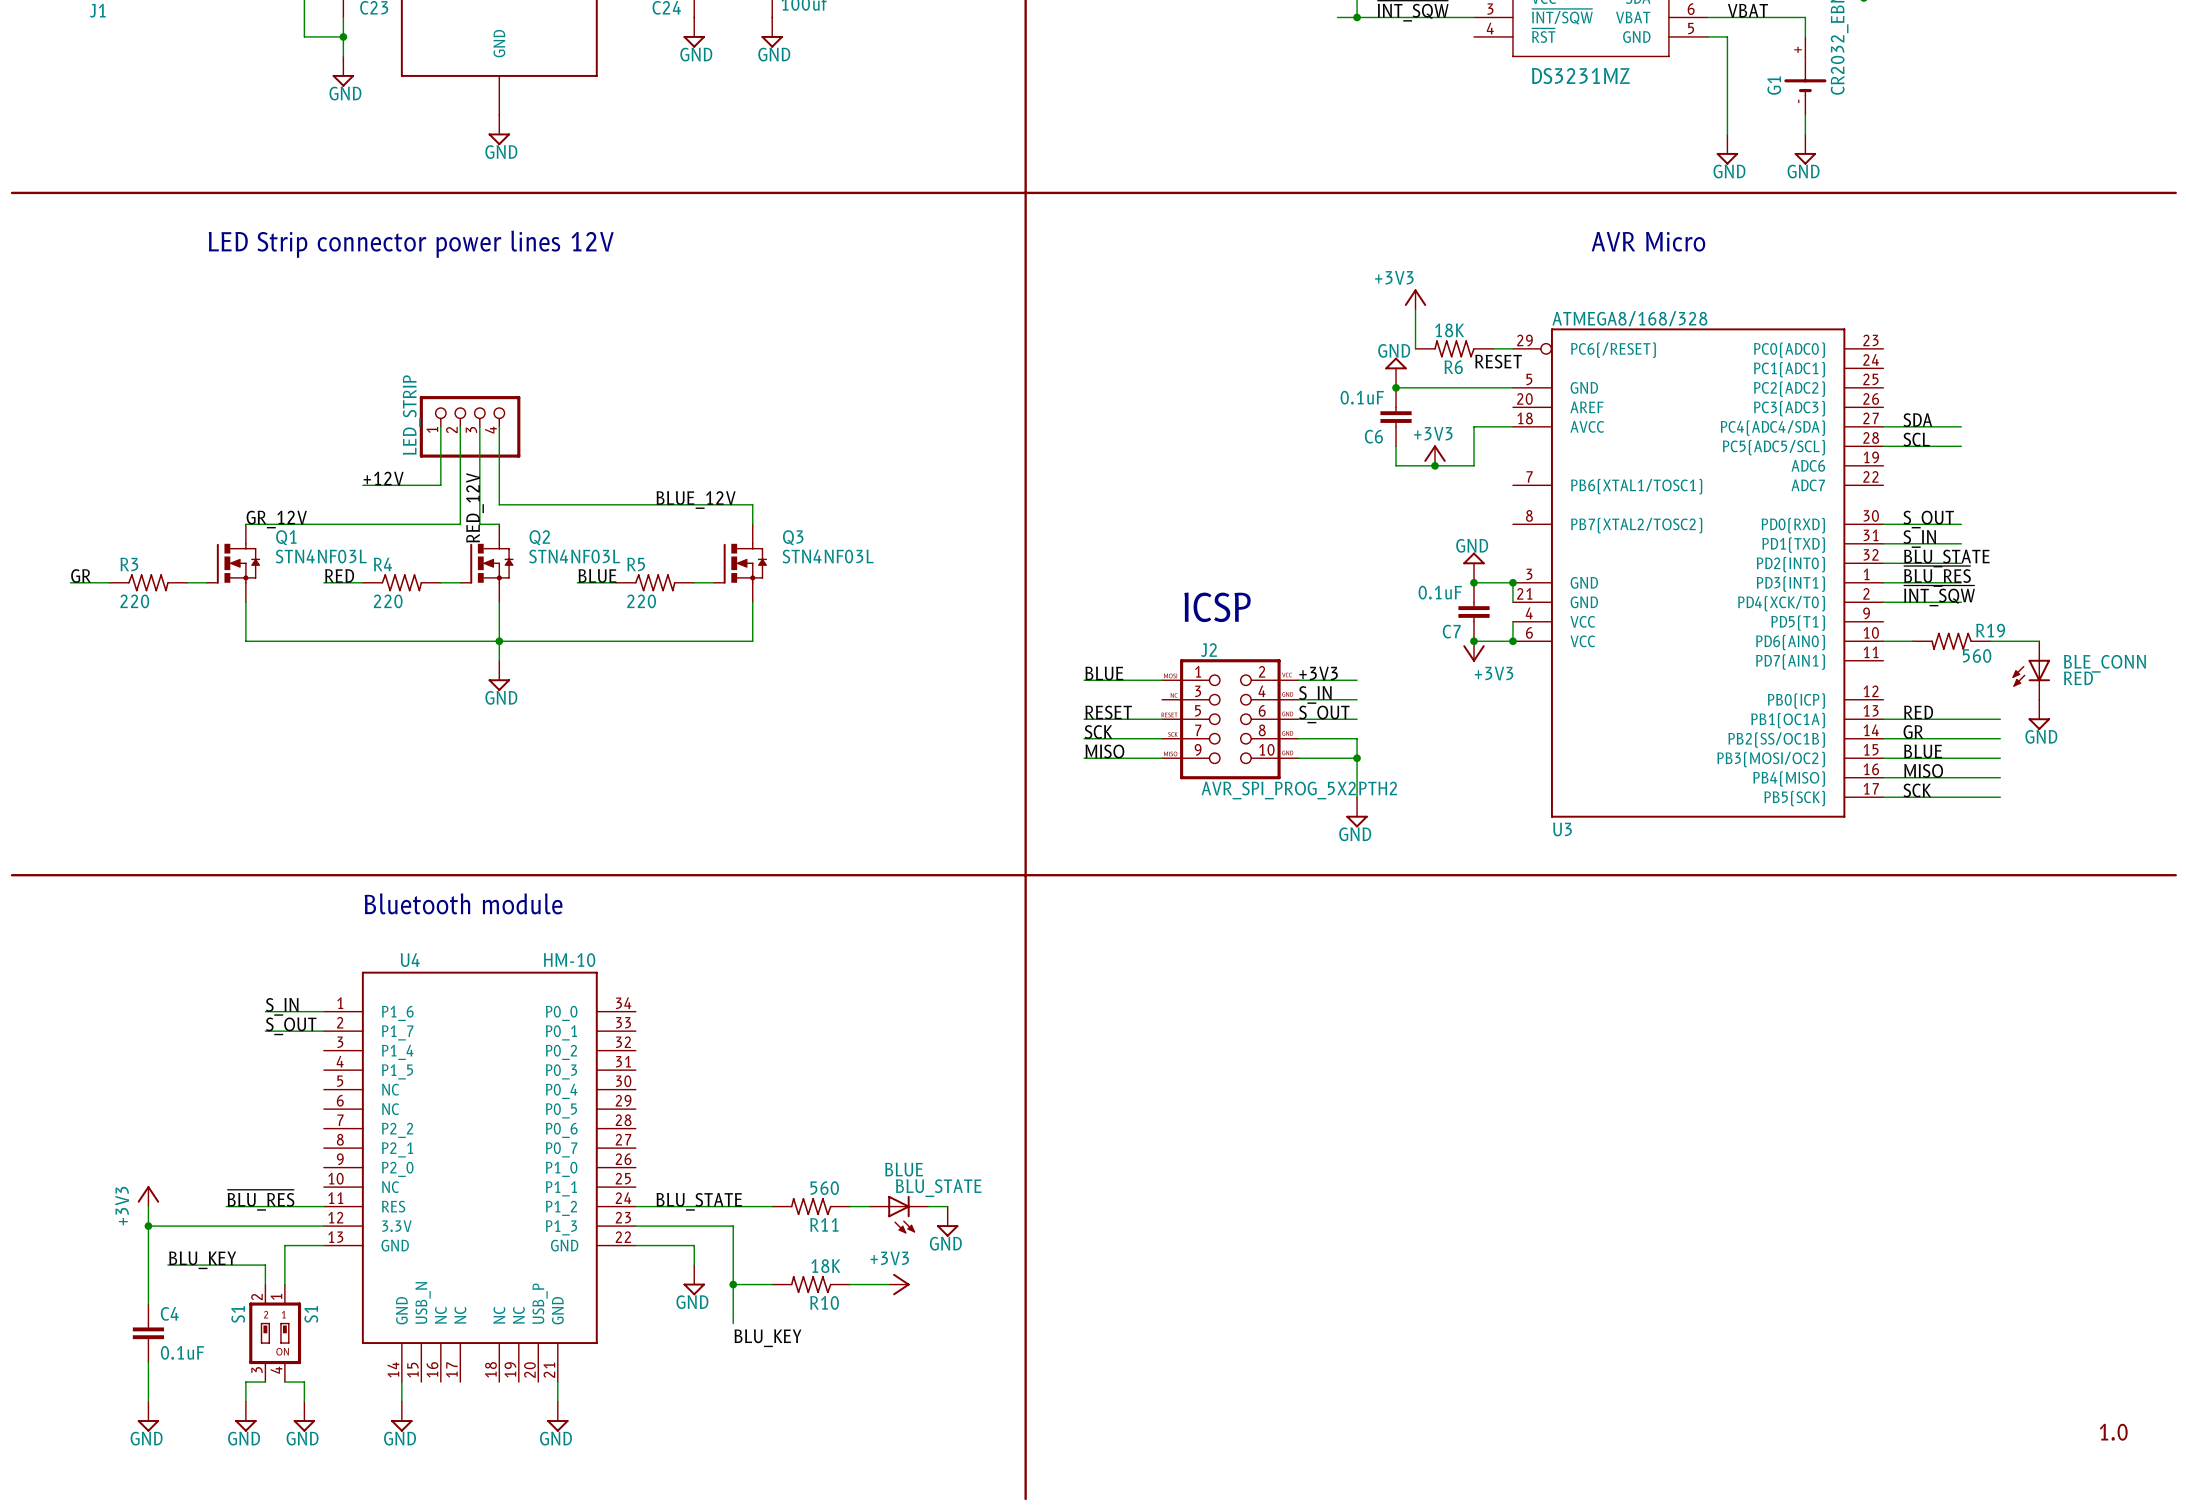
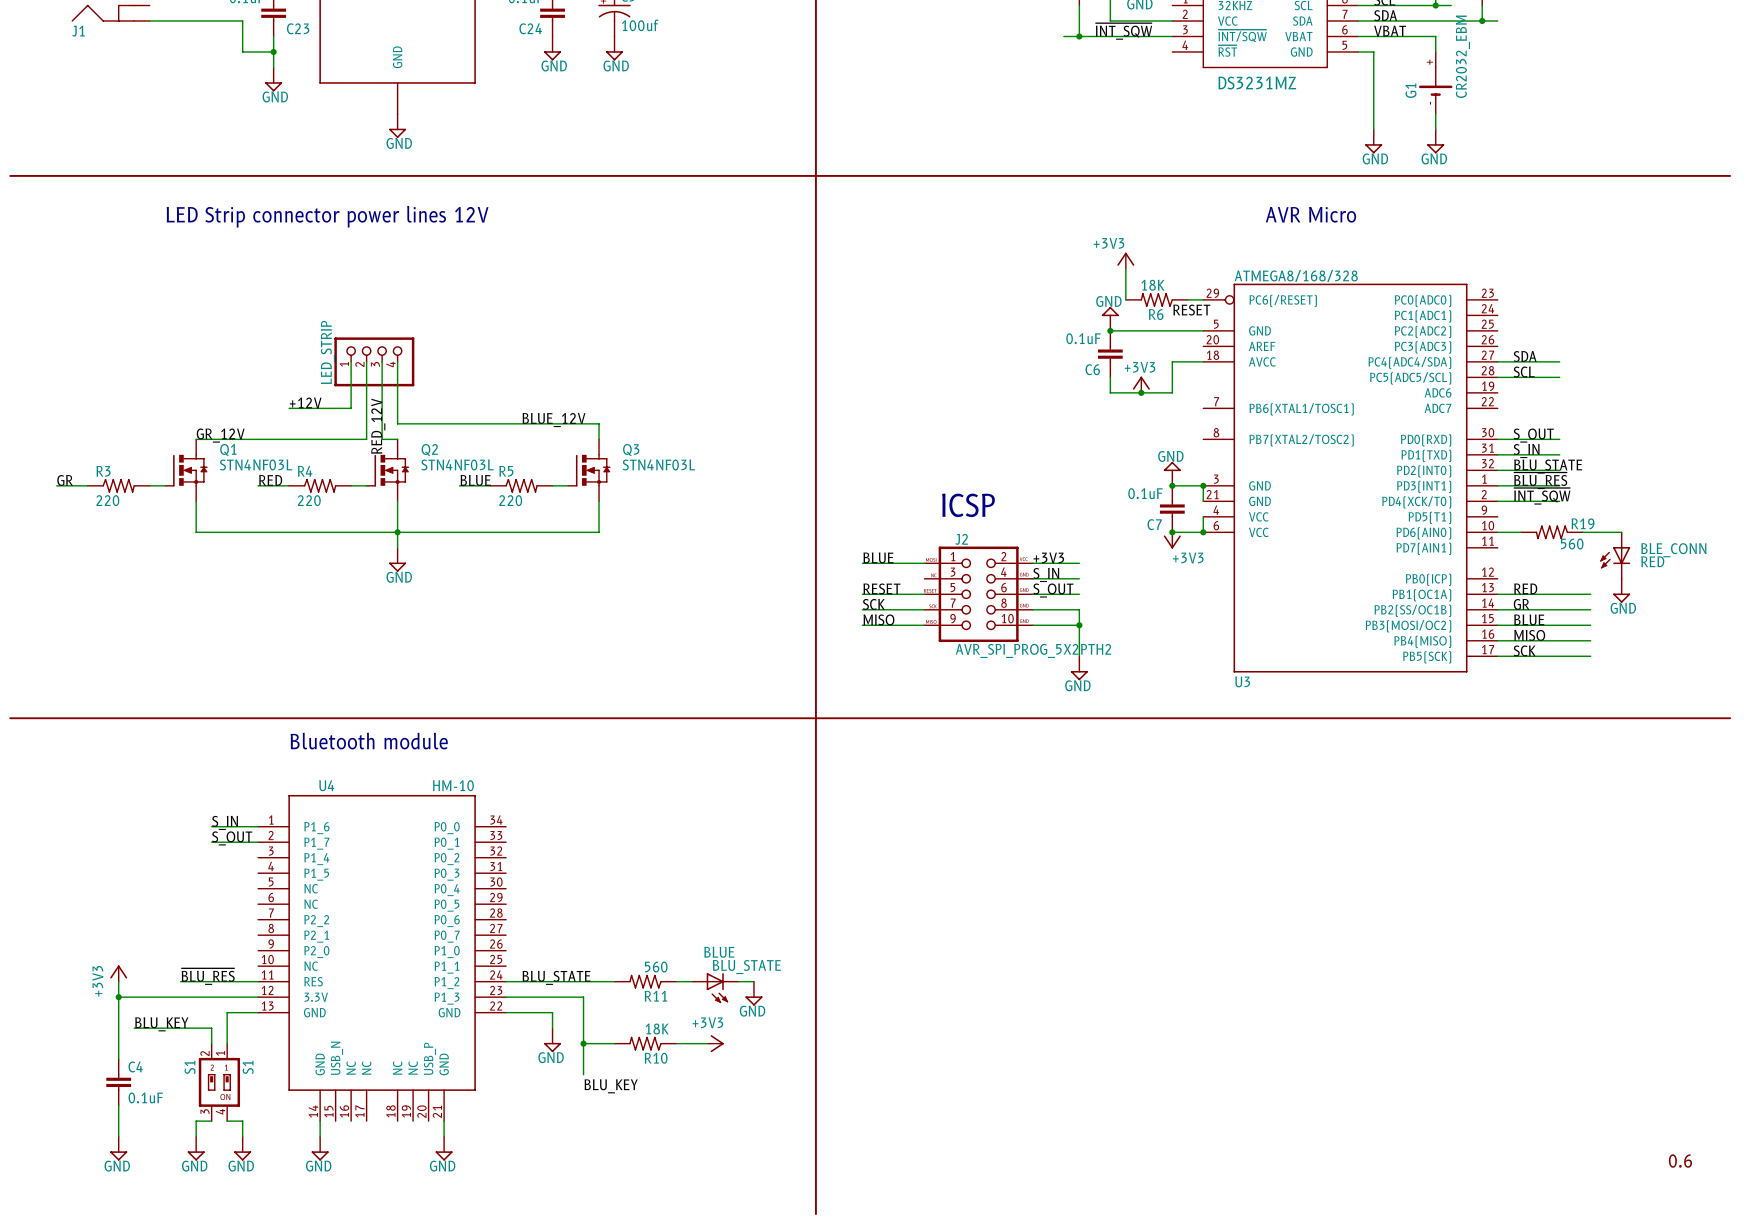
text: 1.0 (2113, 1432) -> 0.6 (1680, 1161)

